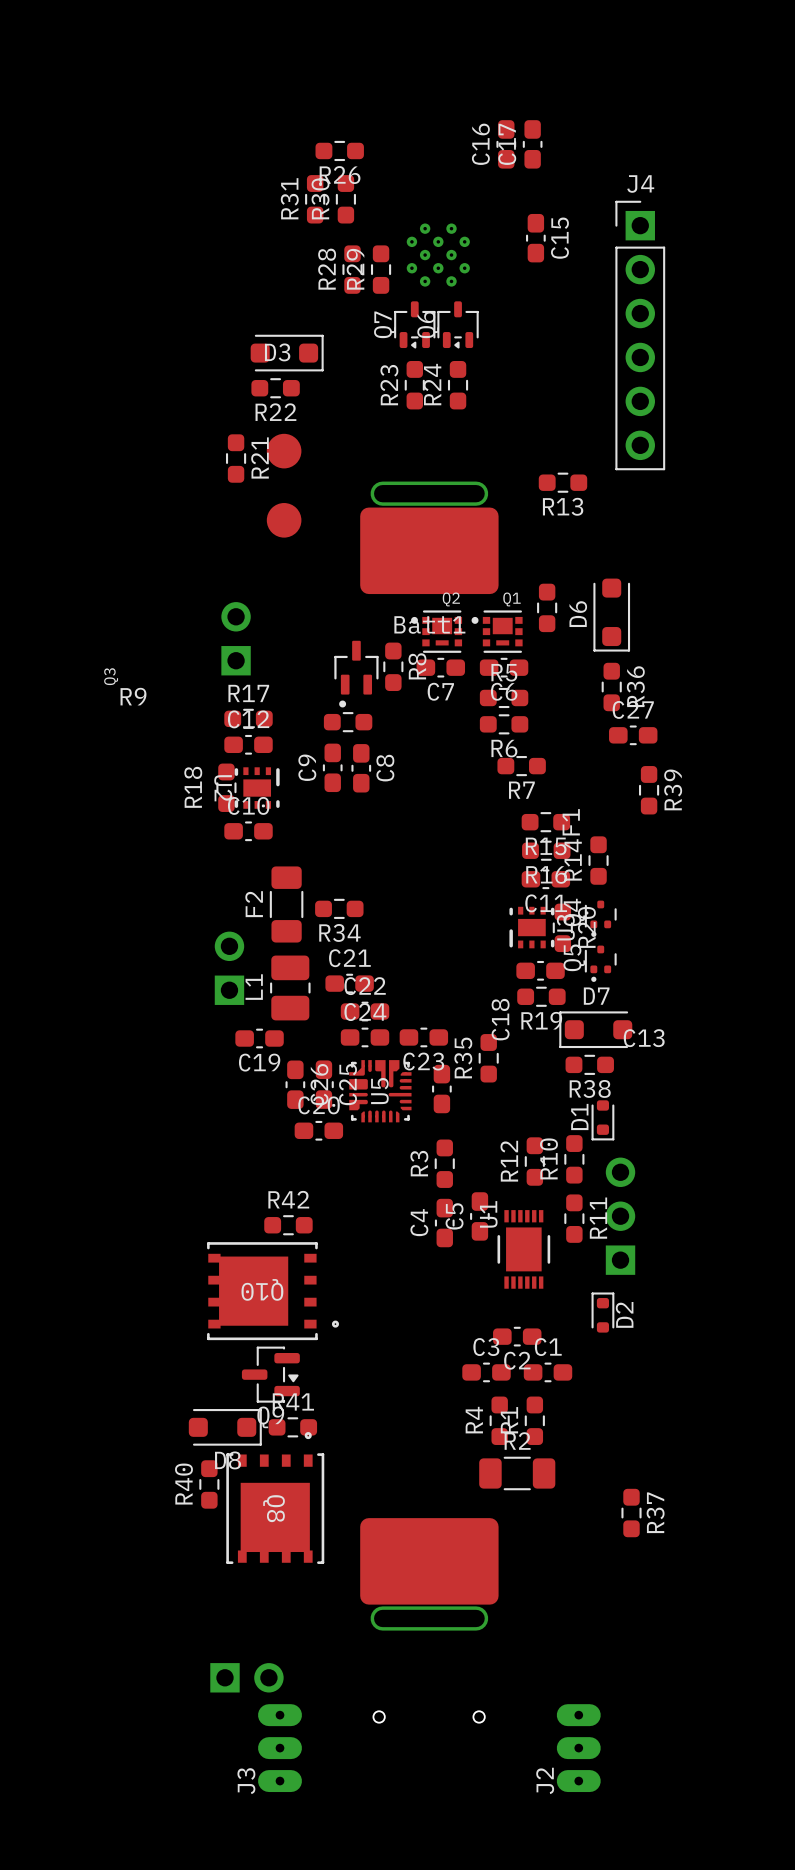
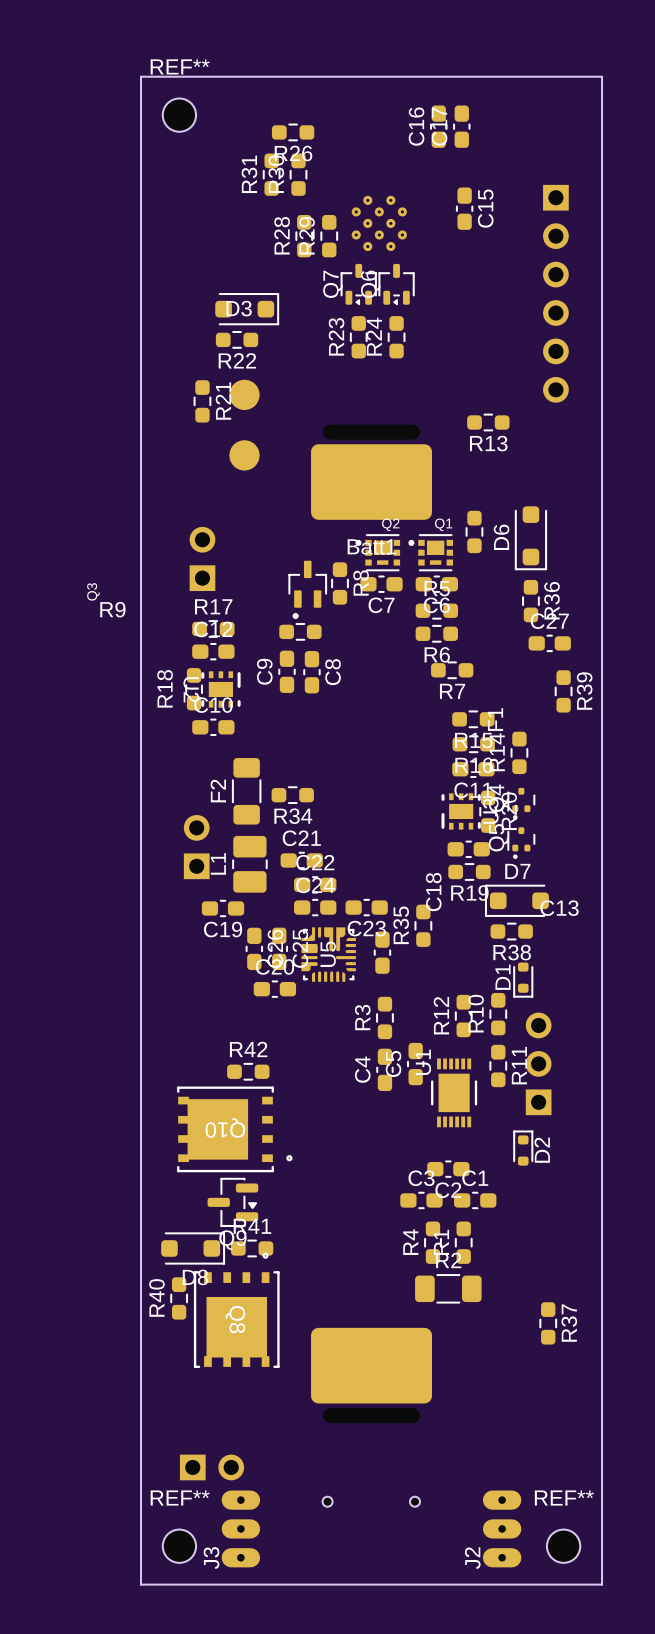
board edge: none -> (141, 76) (602, 76) (602, 1584) (141, 1584) (141, 76)
REF**: none -> (179, 115)
J4 side: top (640, 335) -> bottom (555, 293)
Batt1 footprint: [360, 481, 499, 1631] -> [311, 424, 433, 1424]
REF**: none -> (179, 1546)
REF**: none -> (563, 1546)

